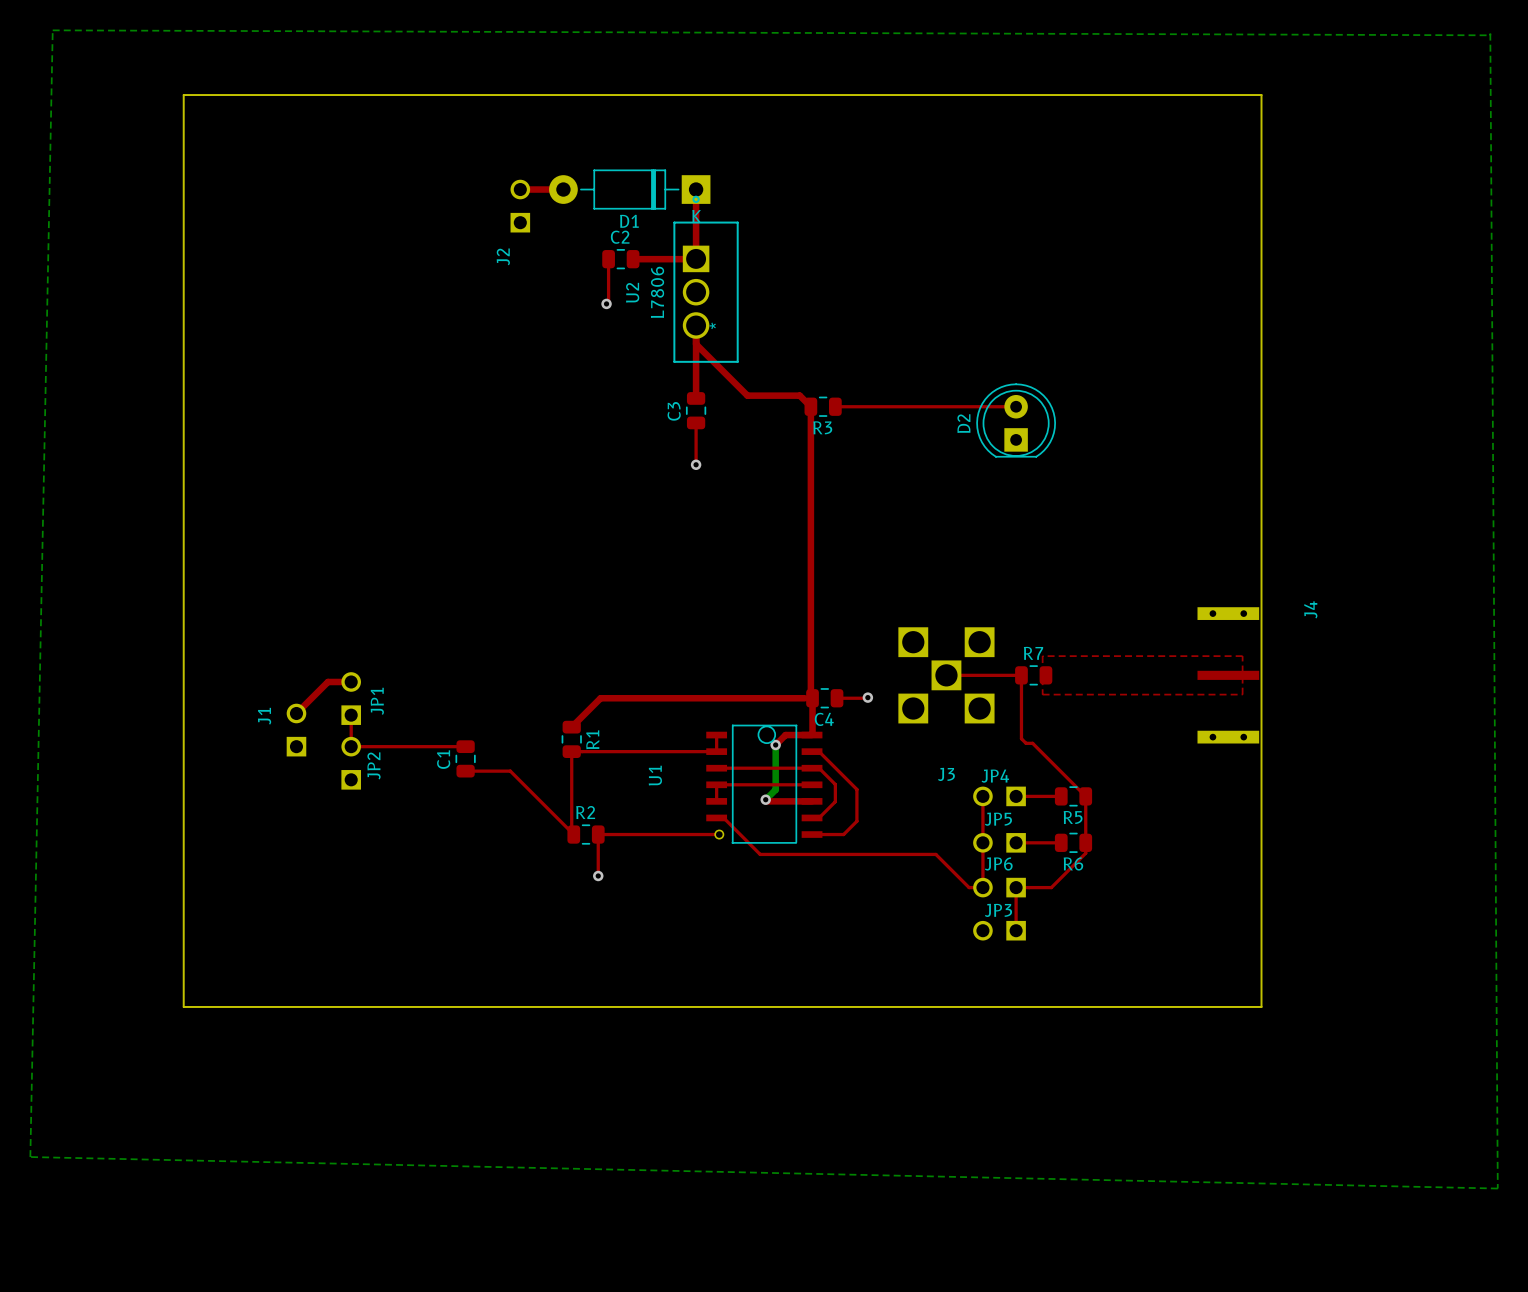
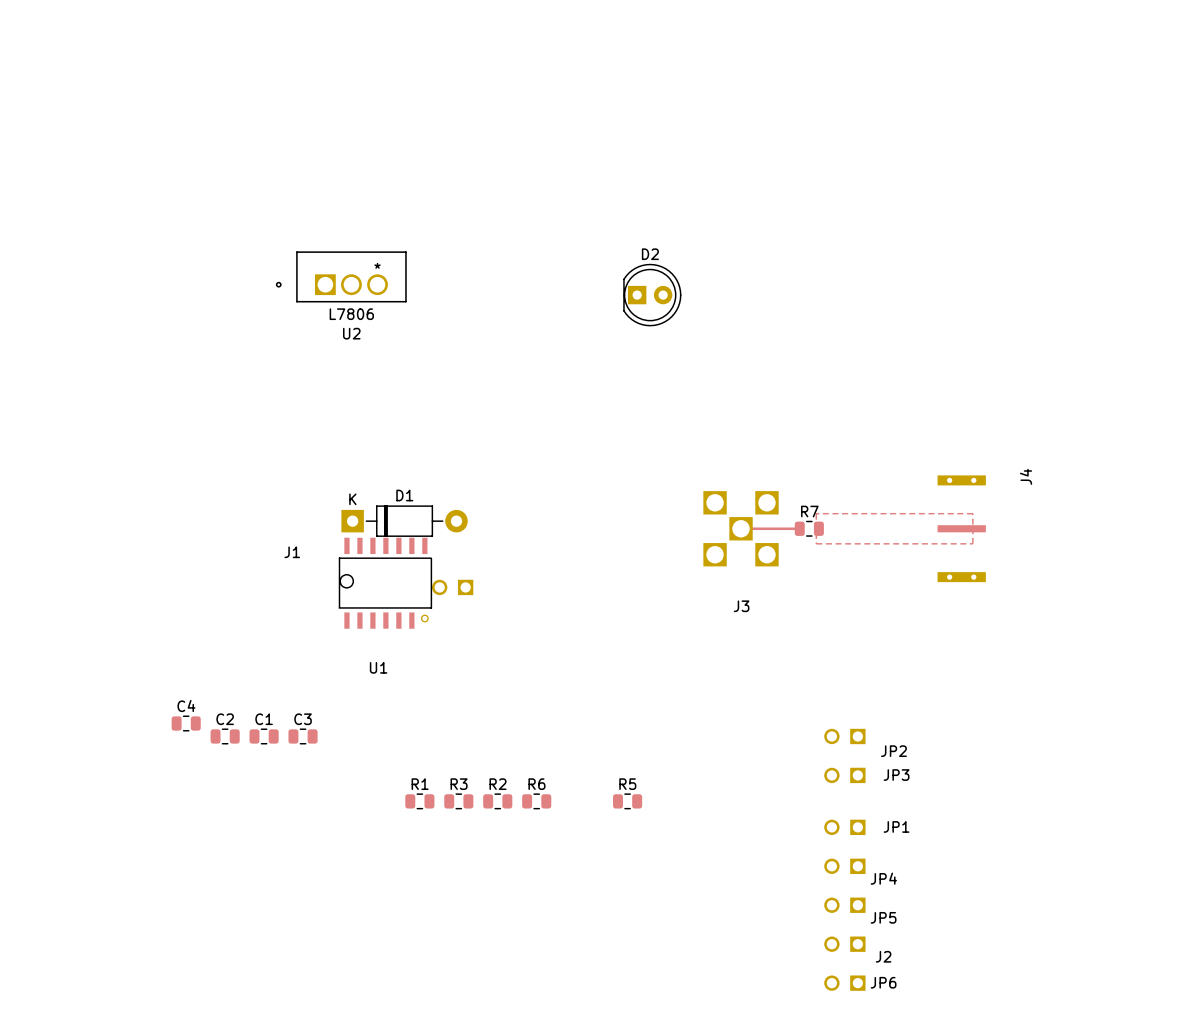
bottom zone outline: (52, 30) (30, 1157) (1497, 1188) (1490, 33) (1490, 35) (52, 30) -> none
board edge: (183, 95) (1261, 95) (1261, 1006) (183, 1006) (183, 95) -> none
top track: (520, 189) (563, 189) -> none
D1 rotation: 0° (629, 189) -> 180° (404, 521)
D1 position: (629, 189) -> (404, 521)
top track: (696, 189) (696, 258) (633, 259) -> none
J2 rotation: 0° (520, 206) -> 90° counterclockwise (844, 944)
J2 position: (520, 206) -> (844, 944)
top track: (608, 259) (608, 301) (606, 303) -> none
C2 position: (620, 259) -> (225, 736)
U2 rotation: 0° (706, 279) -> 90° counterclockwise (341, 276)
U2 position: (706, 279) -> (341, 276)
via: (606, 303) -> none
top track: (696, 325) (696, 398) -> none
top track: (696, 344) (747, 395) (799, 395) (810, 406) (810, 696) (812, 698) -> none
R3 position: (823, 406) -> (458, 801)
top track: (835, 406) (1016, 406) -> none
C3 rotation: 0° (696, 410) -> 90° clockwise (303, 736)
C3 position: (696, 410) -> (303, 736)
D2 rotation: 0° (1016, 420) -> 90° clockwise (652, 295)
D2 position: (1016, 420) -> (652, 295)
top track: (696, 422) (696, 464) -> none
R3 name position: R3 (822, 427) -> R3 (459, 784)
via: (696, 464) -> none
top track: (1021, 675) (1021, 738) (1026, 743) (1032, 743) (1085, 796) (1085, 853) (1051, 887) (1016, 887) (1016, 930) -> none
top track: (351, 681) (327, 681) (296, 713) -> none
top track: (867, 697) (837, 698) -> none
via: (867, 697) -> none
JP1 rotation: 0° (351, 698) -> 90° counterclockwise (844, 827)
JP1 position: (351, 698) -> (844, 827)
top track: (812, 698) (600, 698) (571, 727) -> none
top track: (812, 698) (812, 734) -> none
C4 position: (824, 698) -> (186, 723)
JP1 name position: JP1 (377, 701) -> JP1 (896, 826)
top track: (351, 715) (351, 746) (465, 746) -> none
J1 name position: J1 (264, 716) -> J1 (292, 552)
C4 name position: C4 (824, 719) -> C4 (186, 706)
J1 rotation: 0° (296, 730) -> 90° counterclockwise (452, 587)
J1 position: (296, 730) -> (452, 587)
top track: (812, 734) (785, 735) (775, 745) -> none
top track: (716, 735) (716, 751) (571, 751) (571, 832) -> none
R1 rotation: 0° (571, 739) -> 90° clockwise (419, 801)
R1 position: (571, 739) -> (419, 801)
R1 name position: R1 (592, 739) -> R1 (420, 784)
bottom track: (775, 745) (775, 789) (765, 799) -> none
via: (775, 745) -> none
top track: (812, 751) (819, 751) (856, 789) (856, 821) (843, 834) (812, 834) -> none
C1 rotation: 0° (465, 758) -> 90° clockwise (264, 736)
C1 position: (465, 758) -> (264, 736)
JP2 rotation: 0° (351, 763) -> 90° counterclockwise (844, 736)
JP2 position: (351, 763) -> (844, 736)
JP2 name position: JP2 (373, 765) -> JP2 (893, 751)
top track: (716, 768) (819, 768) (835, 784) (835, 801) (819, 817) (812, 817) -> none
top track: (465, 771) (510, 771) (573, 834) -> none
JP4 name position: JP4 (995, 776) -> JP4 (883, 878)
U1 rotation: 0° (764, 784) -> 90° counterclockwise (385, 583)
U1 position: (764, 784) -> (385, 583)
top track: (812, 784) (716, 784) (716, 801) -> none
top track: (982, 796) (982, 887) (969, 887) (935, 854) (760, 854) (723, 817) (716, 817) -> none
JP4 position: (999, 796) -> (844, 866)
top track: (1016, 796) (1061, 796) -> none
R5 position: (1073, 796) -> (627, 801)
top track: (765, 799) (767, 801) (812, 801) -> none
via: (765, 799) -> none
R5 name position: R5 (1073, 817) -> R5 (627, 784)
JP5 name position: JP5 (998, 819) -> JP5 (883, 917)
R2 position: (586, 834) -> (497, 801)
top track: (719, 834) (598, 834) (598, 875) -> none
JP5 position: (999, 842) -> (844, 905)
top track: (1016, 842) (1061, 842) -> none
R6 position: (1073, 842) -> (536, 801)
JP6 name position: JP6 (998, 863) -> JP6 (883, 982)
R6 name position: R6 (1073, 863) -> R6 (536, 784)
via: (598, 875) -> none
JP6 position: (999, 887) -> (844, 983)
JP3 name position: JP3 (998, 910) -> JP3 (896, 775)
JP3 position: (999, 930) -> (844, 775)

